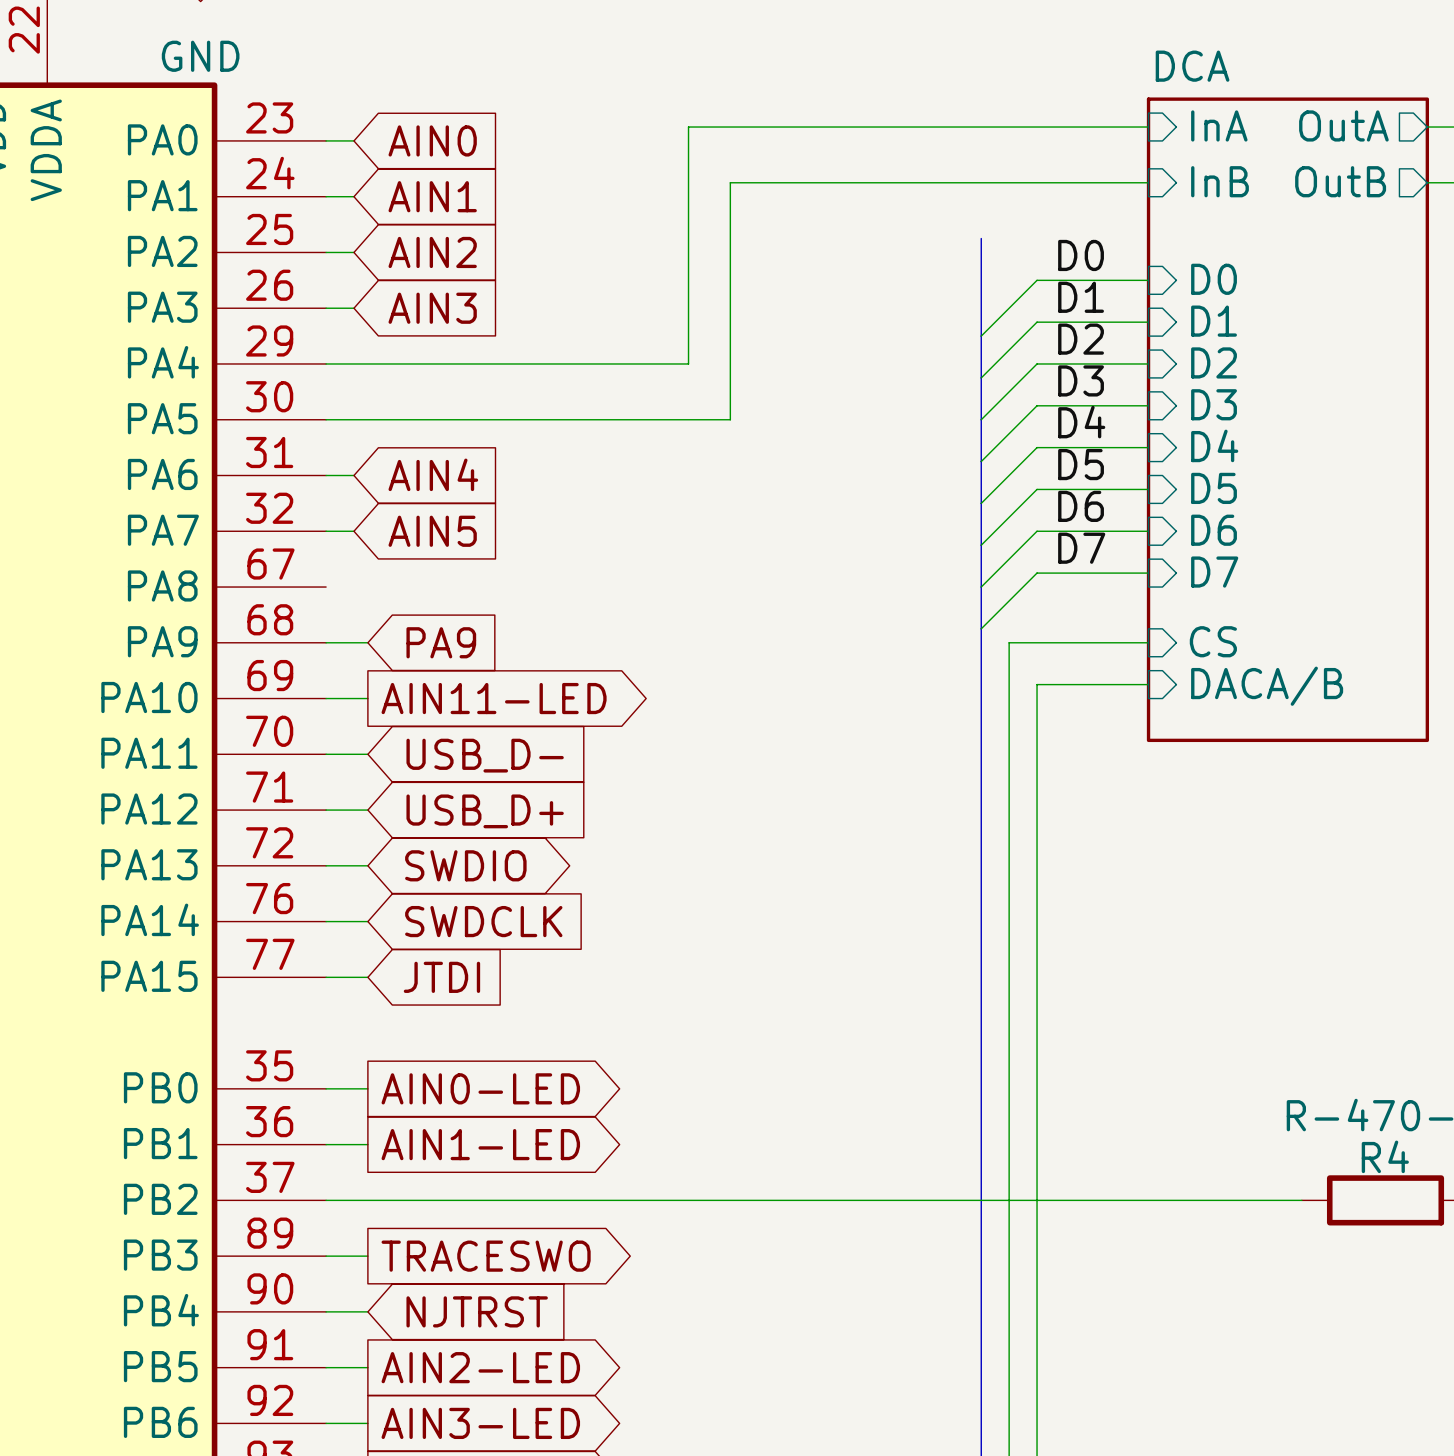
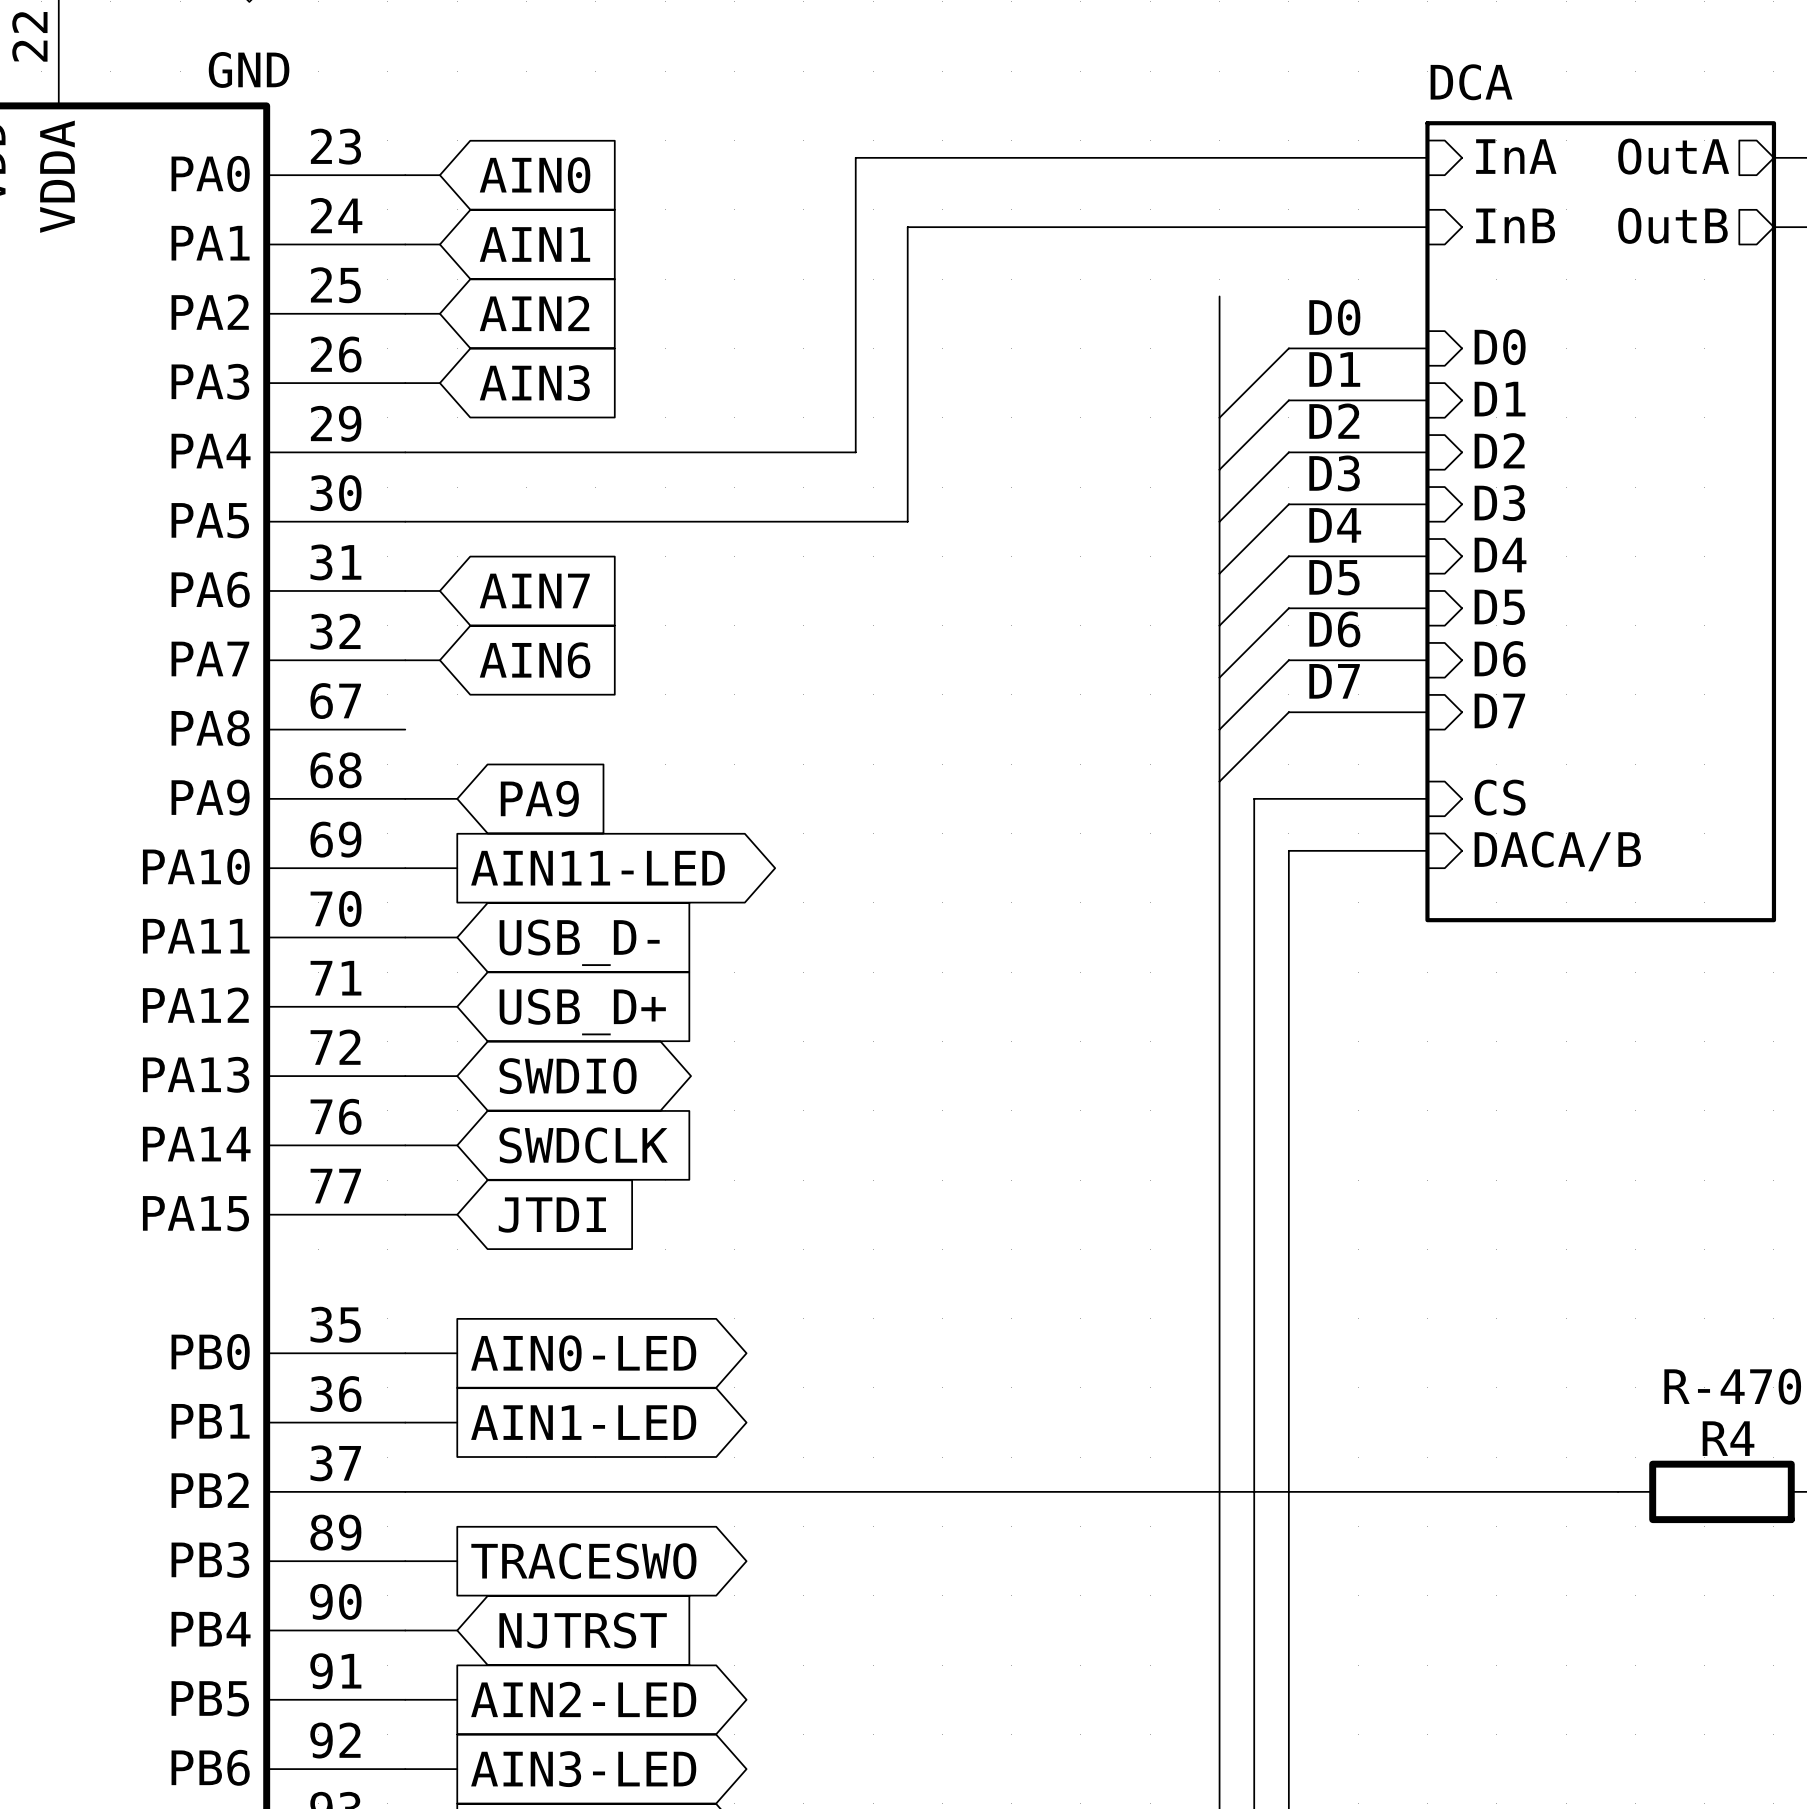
global label: AIN4 (433, 474) -> AIN7 (534, 590)
global label: AIN5 (432, 531) -> AIN6 (535, 660)

